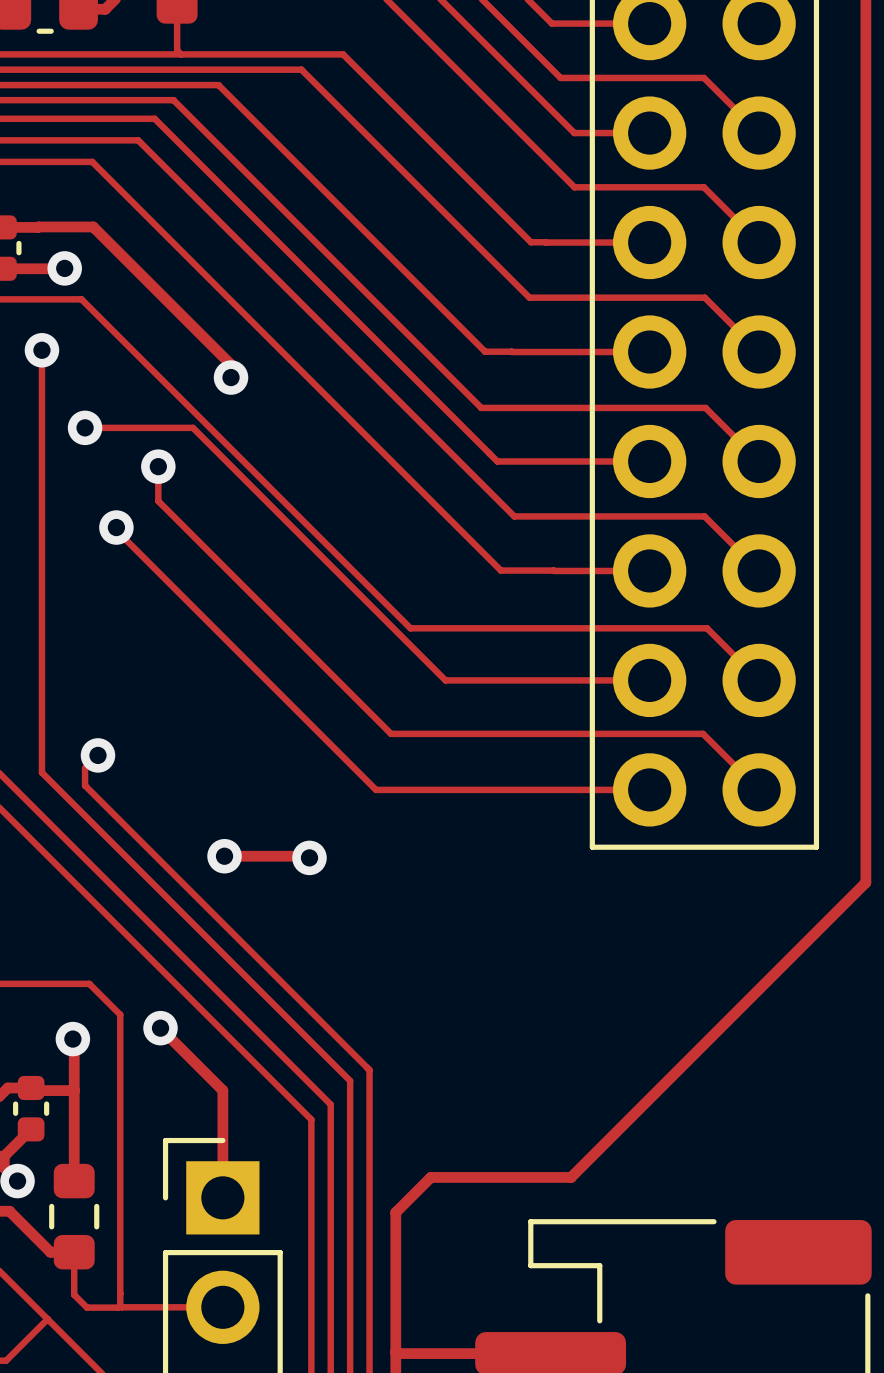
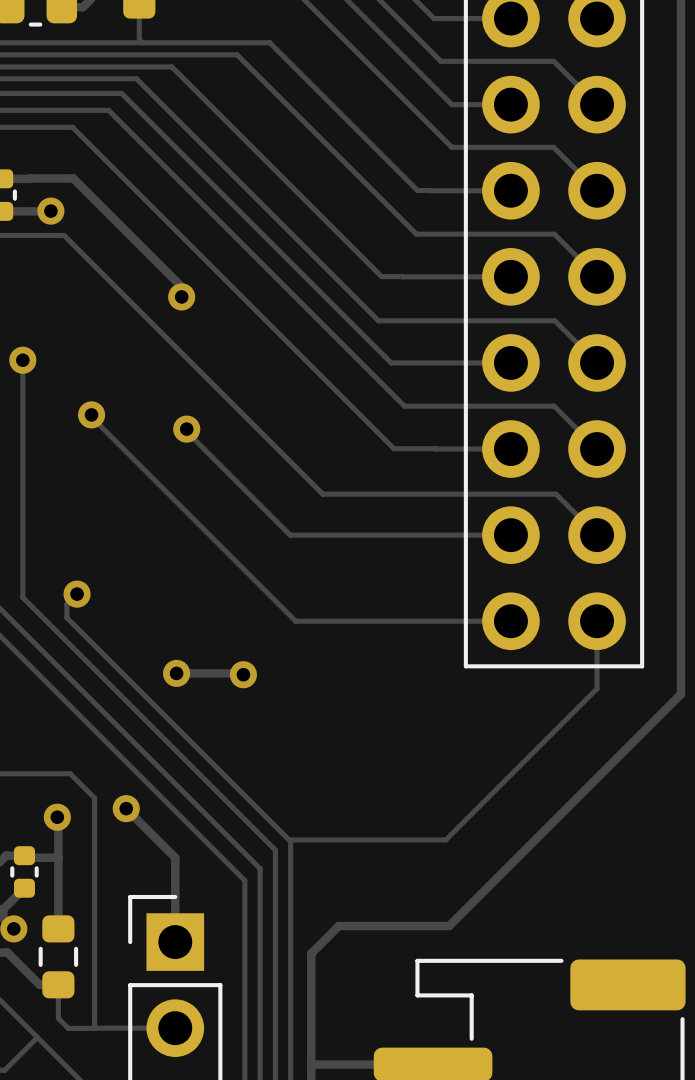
track: (41, 350) (41, 772) -> (22, 360) (22, 597) (33, 607)
via: (41, 350) -> none
track: (85, 427) (192, 427) (445, 680) -> (186, 429) (186, 431) (290, 535) (350, 535)
via: (85, 427) -> none
via: none -> (22, 360)
track: (158, 466) (158, 501) (391, 733) (703, 733) (759, 789) -> (288, 839) (445, 839) (597, 688) (597, 621)
via: (158, 466) -> none
via: none -> (186, 429)

